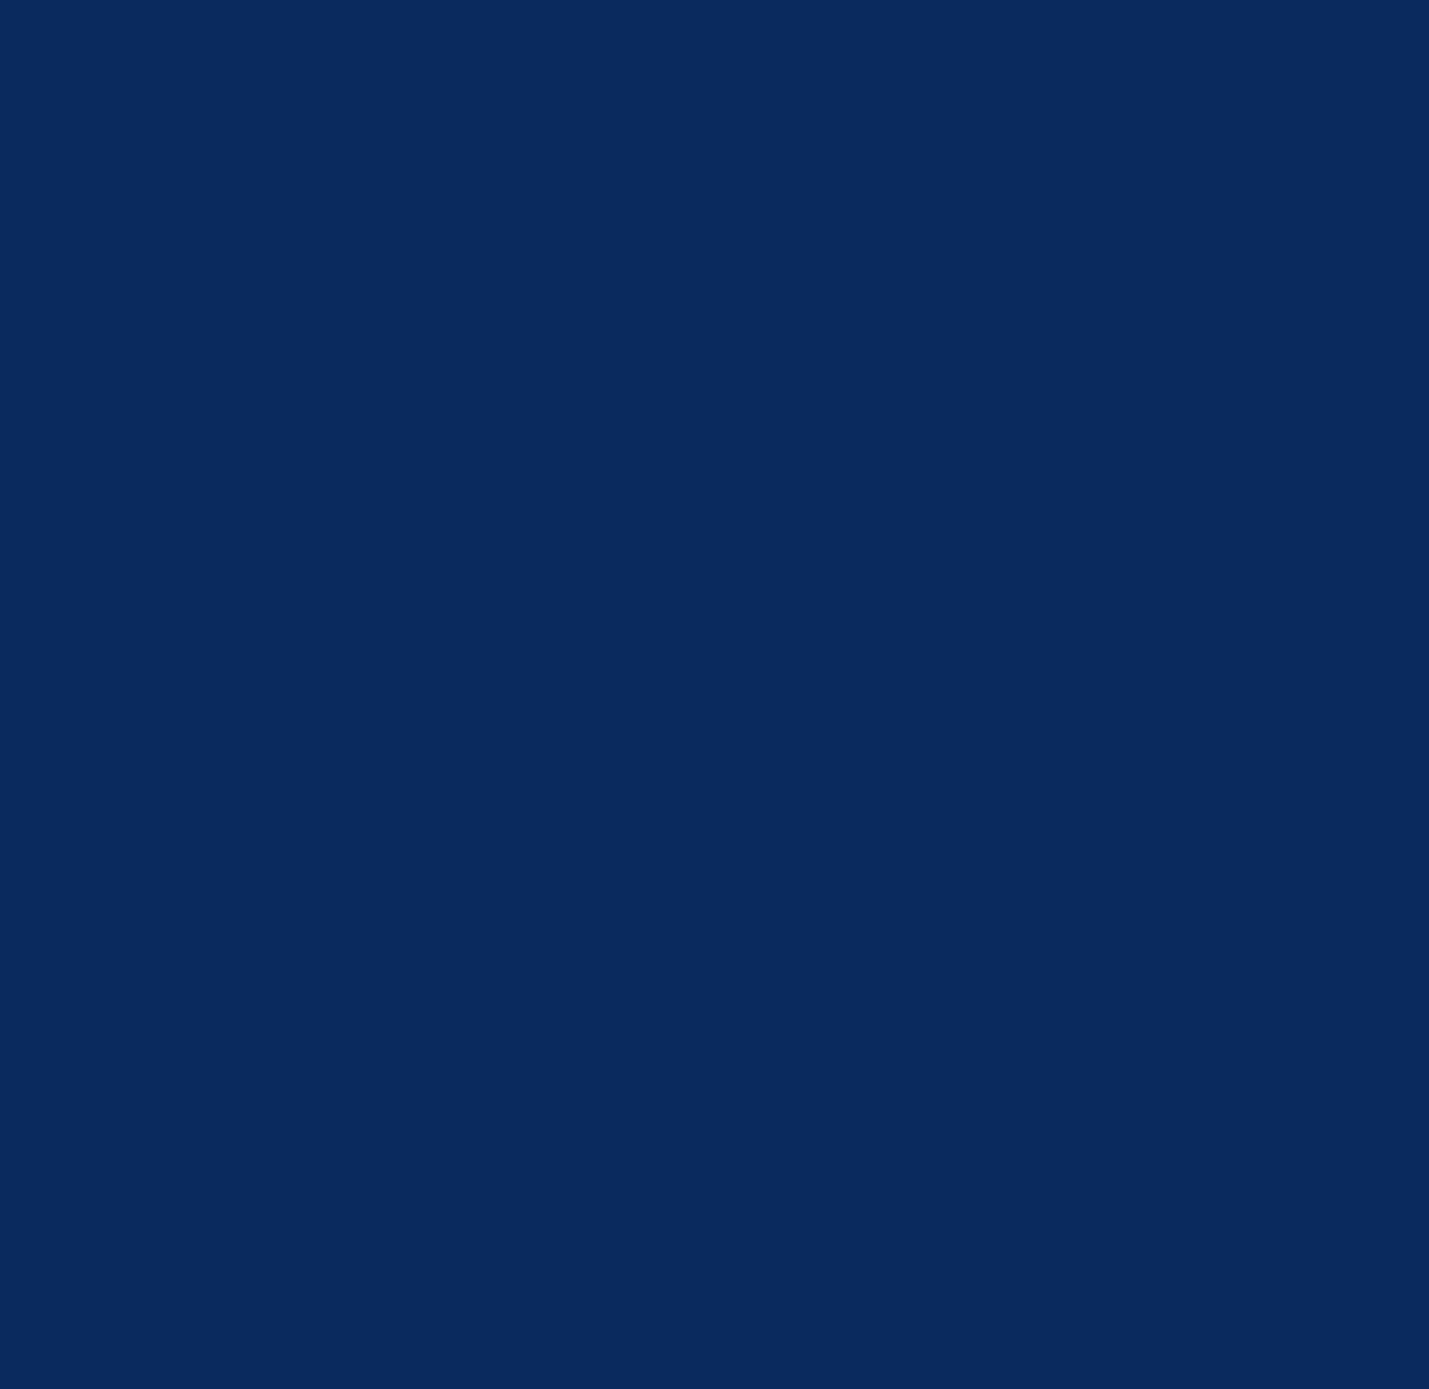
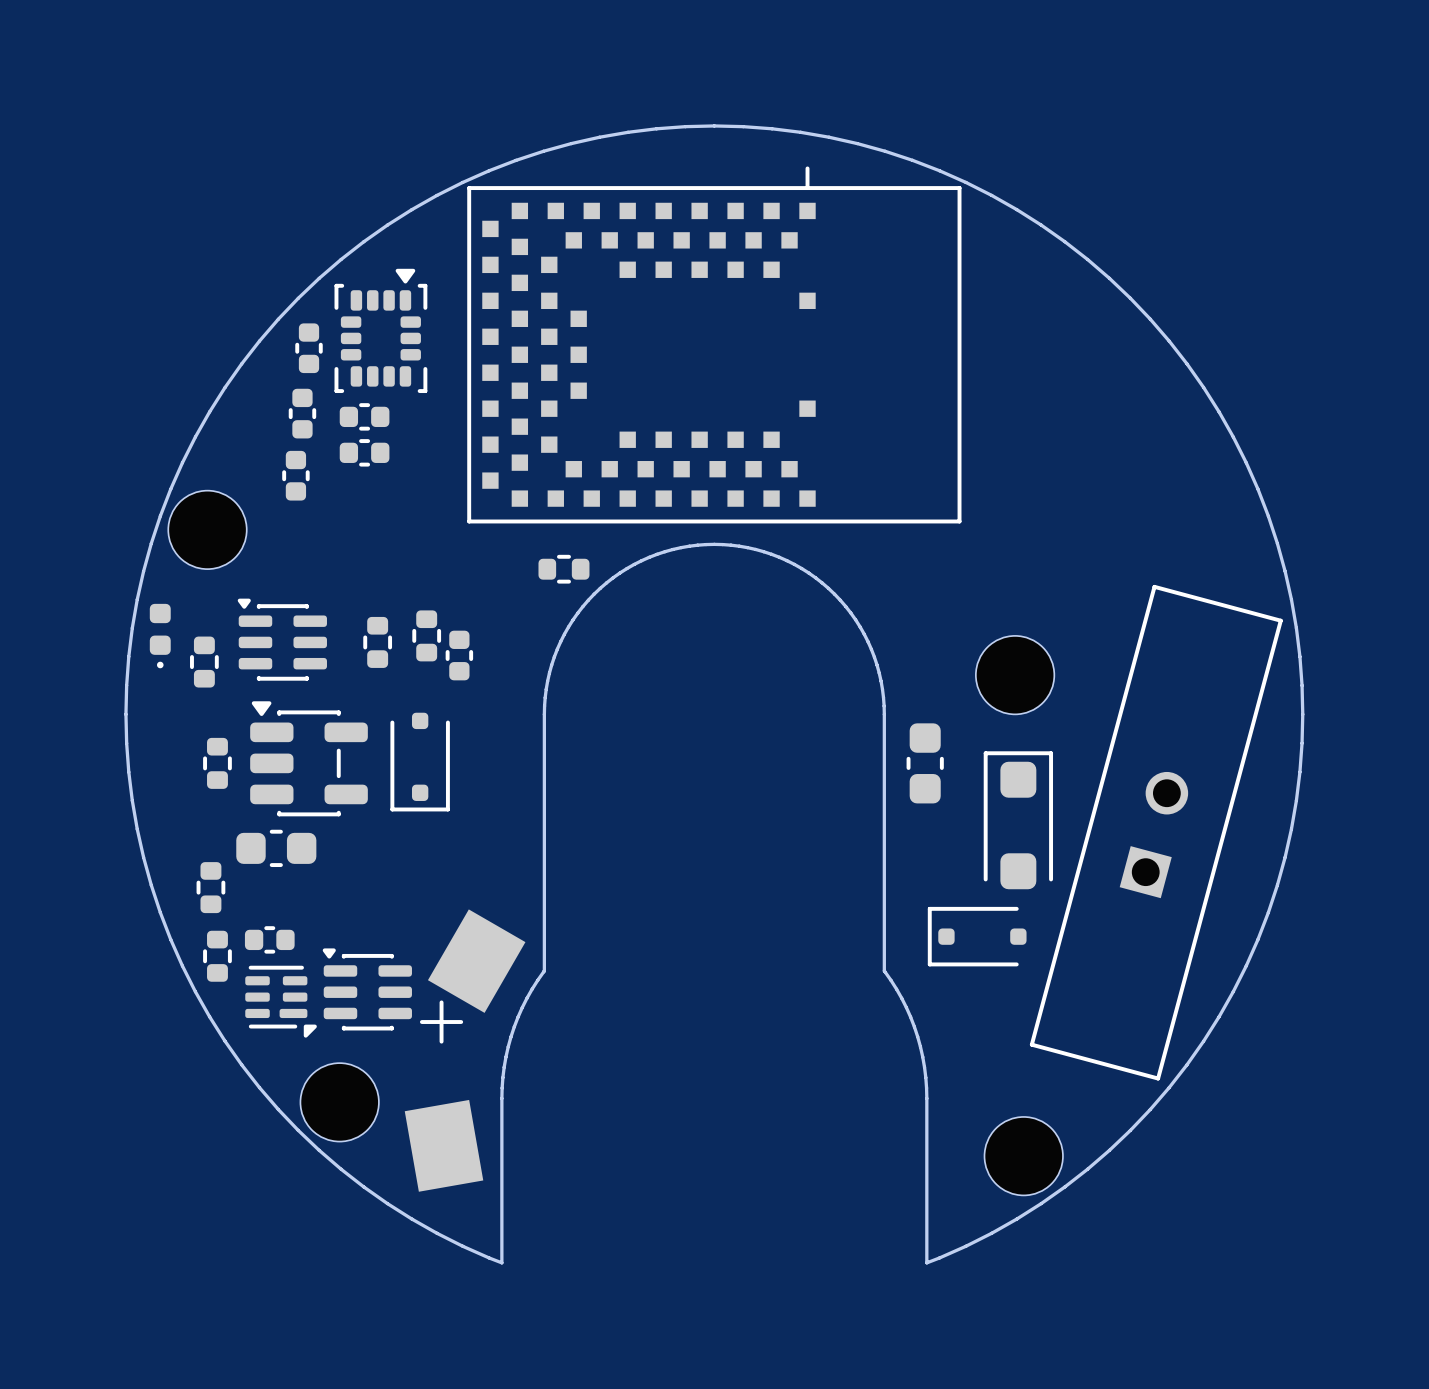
board edge: none -> (714, 125) (656, 128) (599, 137) (516, 160) (436, 195) (387, 225) (341, 259) (298, 298) (259, 341) (209, 411) (182, 462) (160, 516) (137, 599) (128, 656) (125, 714) (132, 800) (151, 885) (170, 939) (195, 991) (225, 1041) (259, 1087) (319, 1150) (363, 1186) (411, 1219) (462, 1246) (501, 1262) (501, 1098) (504, 1067) (511, 1036) (518, 1017) (532, 989) (544, 971) (544, 714) (547, 681) (560, 641) (577, 613) (606, 582) (634, 564) (673, 549) (706, 544) (739, 546) (771, 554) (801, 568) (834, 594) (855, 619) (871, 649) (881, 681) (884, 706) (884, 971) (896, 989) (910, 1017) (917, 1036) (924, 1067) (926, 1098) (926, 1262) (991, 1233) (1064, 1186) (1130, 1130) (1169, 1087) (1203, 1041) (1246, 965) (1277, 885) (1291, 829) (1299, 772) (1302, 714) (1296, 628) (1285, 571) (1268, 516) (1246, 462) (1203, 387) (1169, 341) (1130, 298) (1087, 259) (1041, 225) (965, 182) (885, 151) (829, 137) (772, 128) (714, 125)
part: none -> (380, 330)
part: none -> (714, 344)
part: none -> (309, 348)
part: none -> (302, 413)
part: none -> (364, 416)
part: none -> (364, 452)
part: none -> (295, 475)
part: none -> (207, 529)
part: none -> (563, 569)
part: none -> (426, 635)
part: none -> (160, 636)
part: none -> (282, 639)
part: none -> (377, 642)
part: none -> (459, 655)
part: none -> (204, 662)
part: none -> (1015, 675)
part: none -> (309, 758)
part: none -> (420, 762)
part: none -> (217, 763)
part: none -> (925, 763)
part: none -> (1018, 820)
part: none -> (1156, 832)
part: none -> (276, 848)
part: none -> (210, 887)
part: none -> (977, 936)
part: none -> (269, 939)
part: none -> (217, 956)
part: none -> (367, 989)
part: none -> (281, 1001)
part: none -> (465, 1050)
part: none -> (339, 1102)
part: none -> (1023, 1156)

